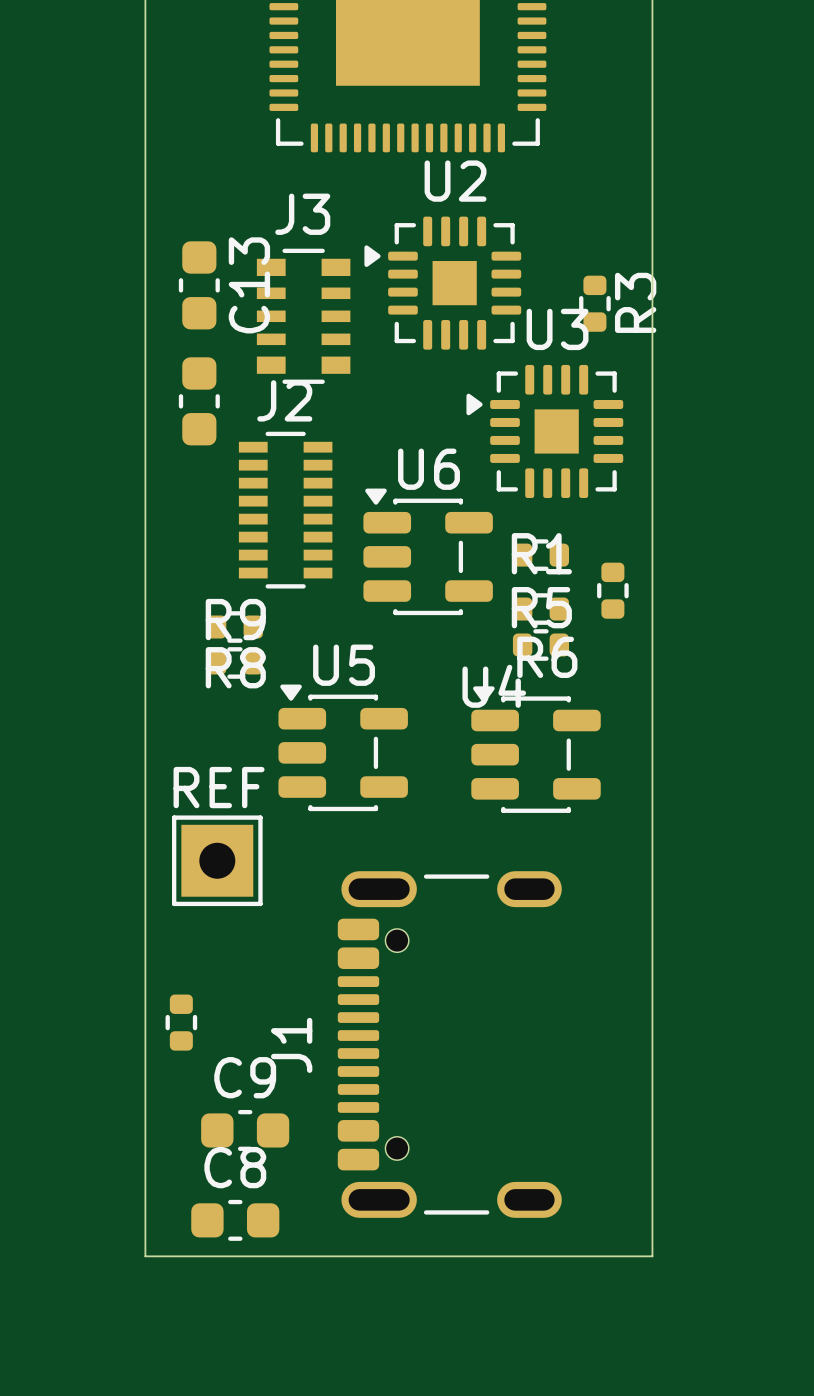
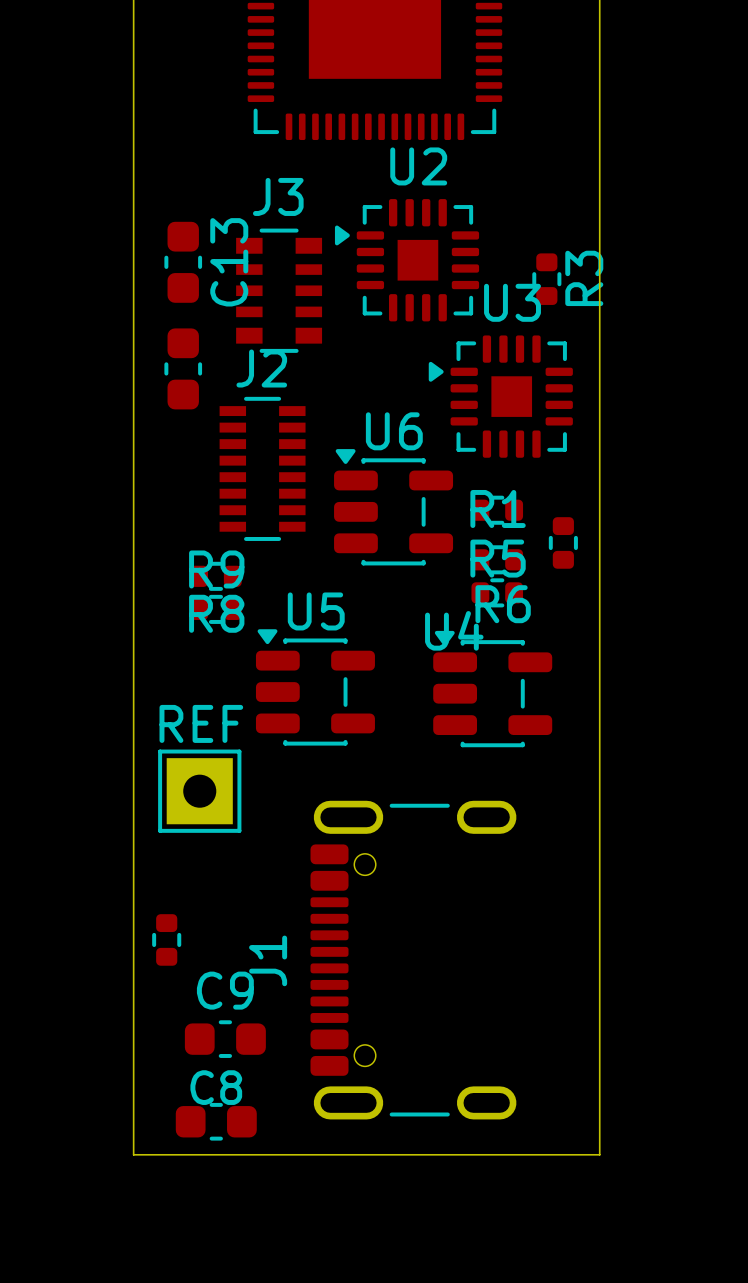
C8 name position: C8 (235, 1167) -> C8 (216, 1087)

